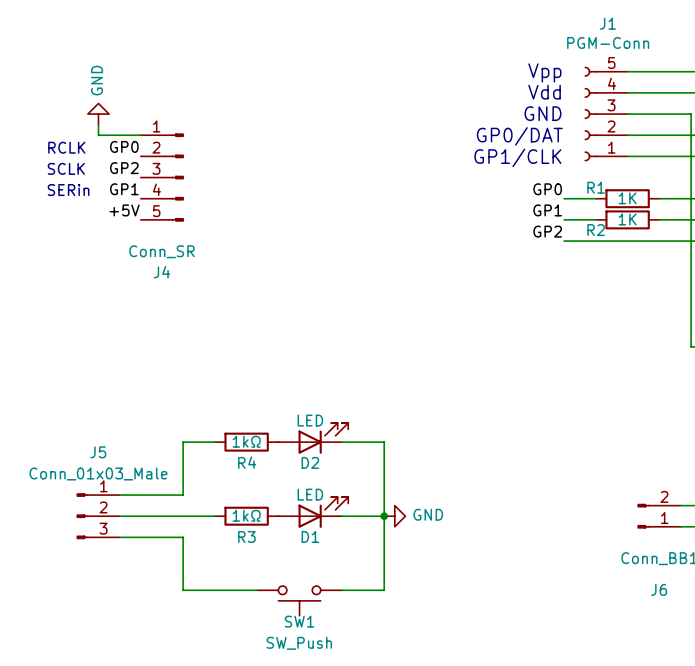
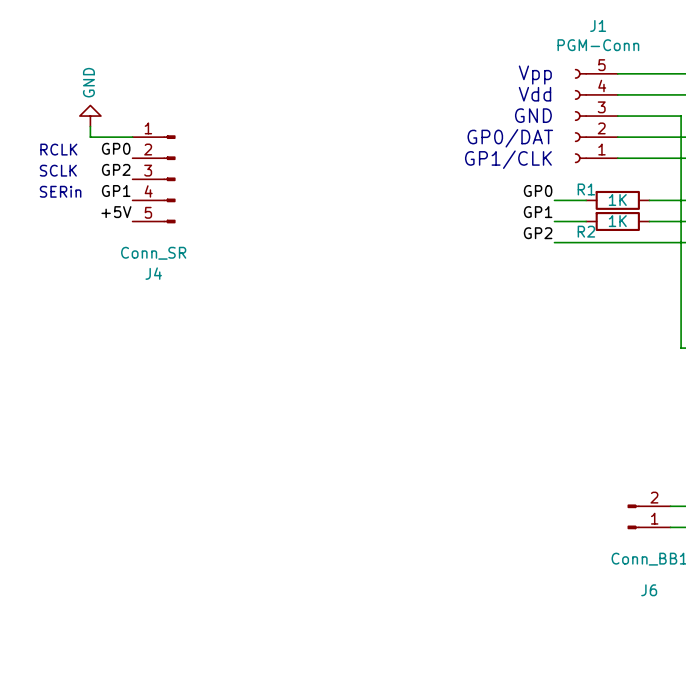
D2: LED (313, 438) -> none
wire: (214, 442) (183, 442) (183, 495) (119, 495) -> none
R4: 1kΩ (246, 442) -> none
wire: (341, 442) (384, 442) (384, 590) (341, 590) -> none
D1: LED (313, 512) -> none
J5: Conn_01x03_Male (98, 516) -> none
wire: (119, 516) (214, 516) -> none
R3: 1kΩ (246, 516) -> none
wire: (341, 516) (384, 516) -> none
junction: (384, 516) -> none
power symbol: GND (394, 516) -> none
wire: (119, 537) (183, 537) (183, 590) (257, 590) -> none
SW1: SW_Push (299, 600) -> none

